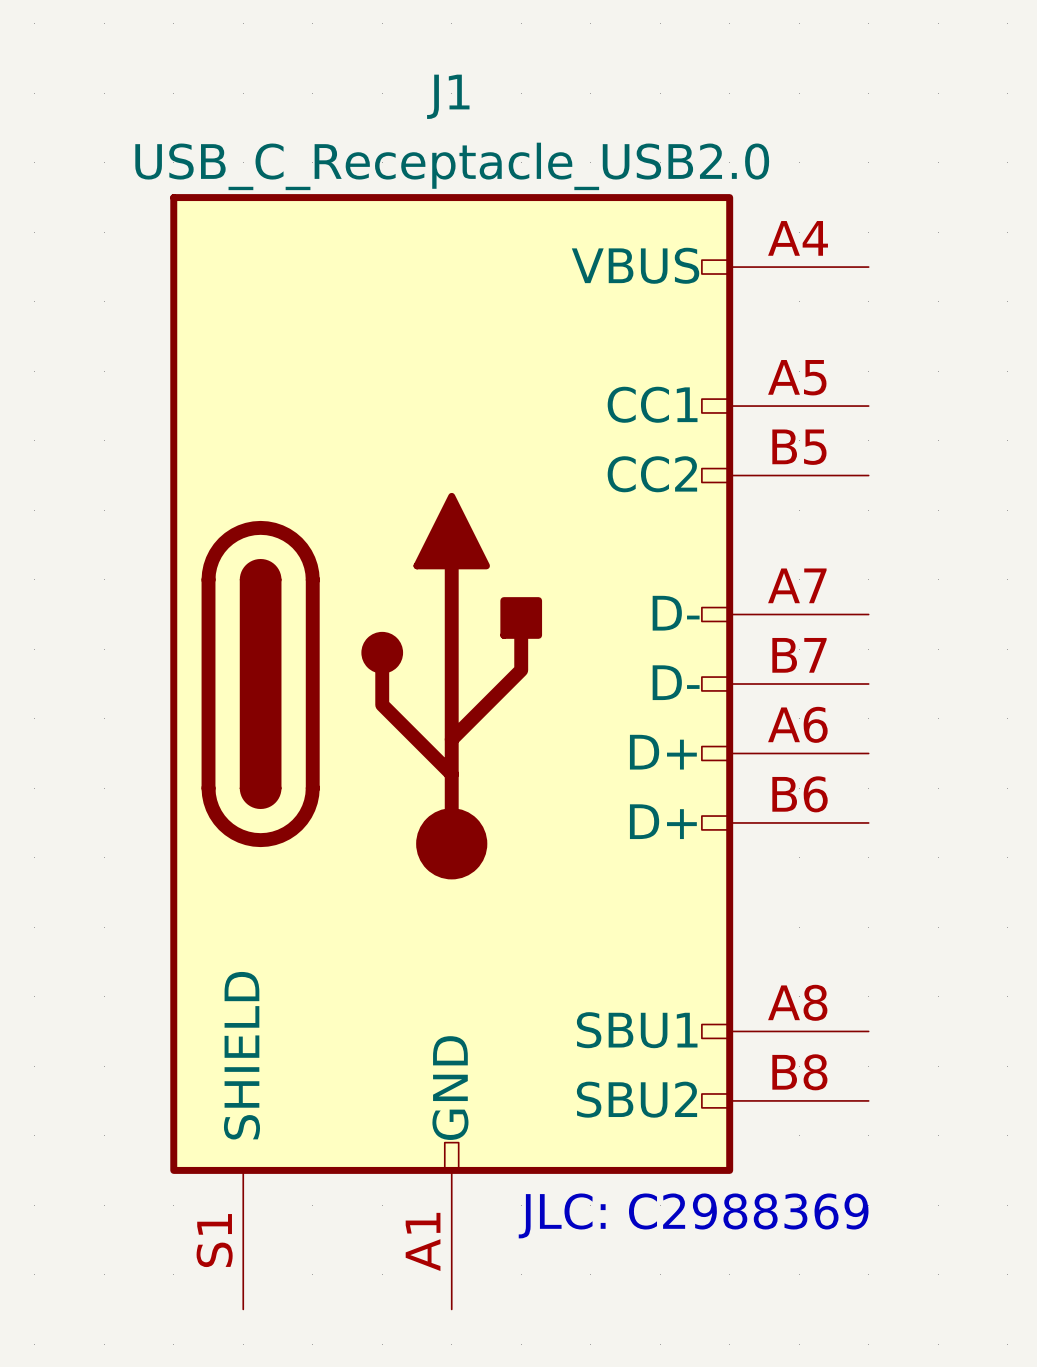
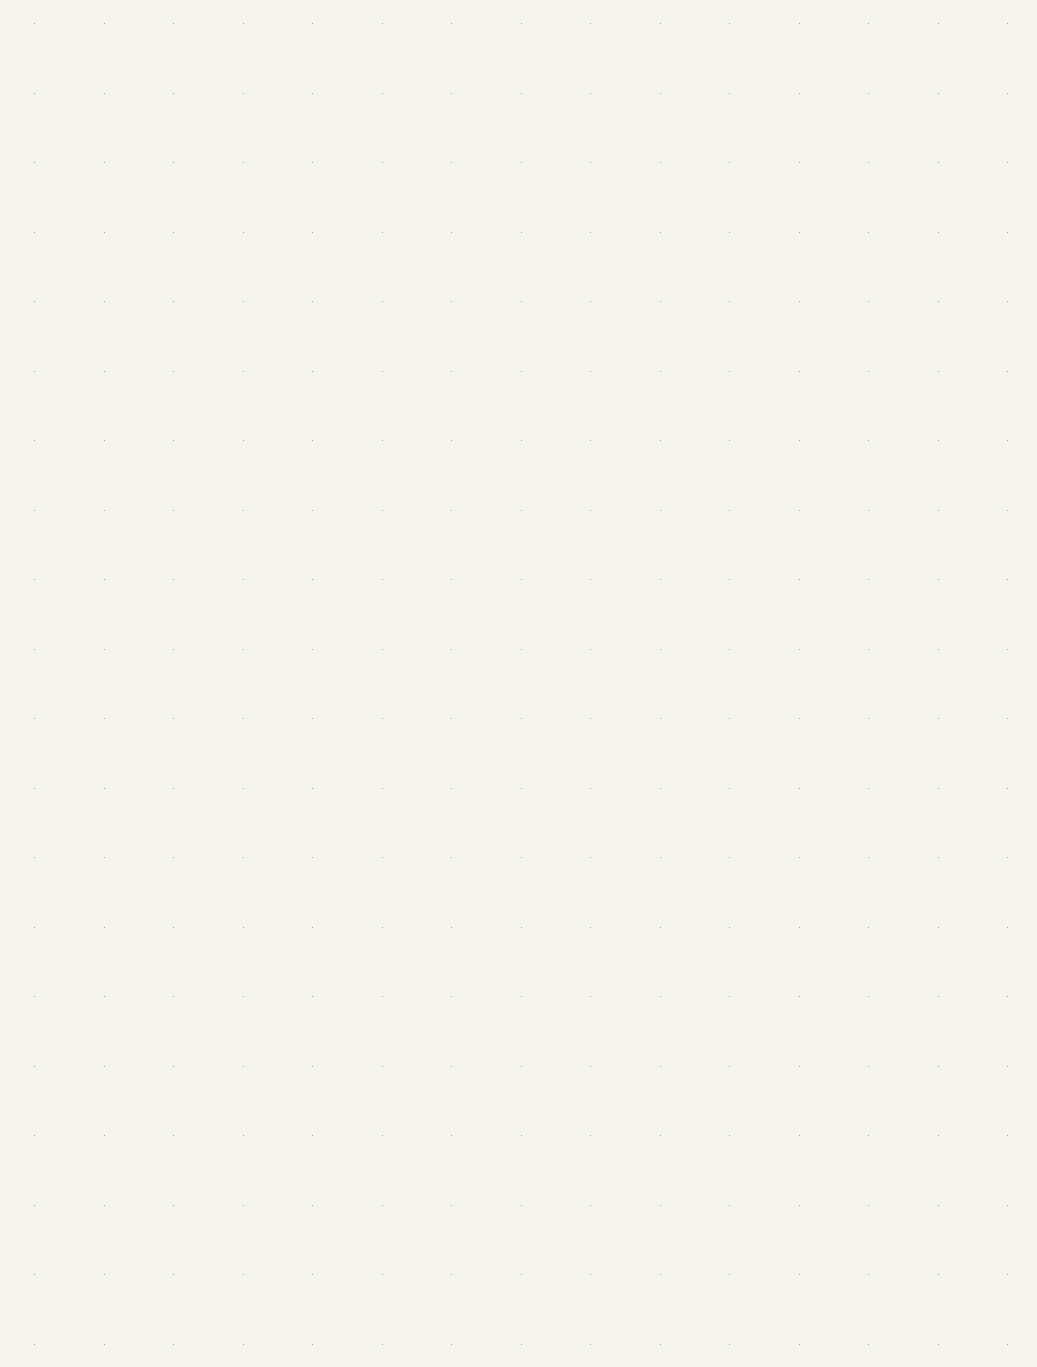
J1: USB_C_Receptacle_USB2.0 (519, 751) -> none
text: JLC: C2988369 (693, 1215) -> none

